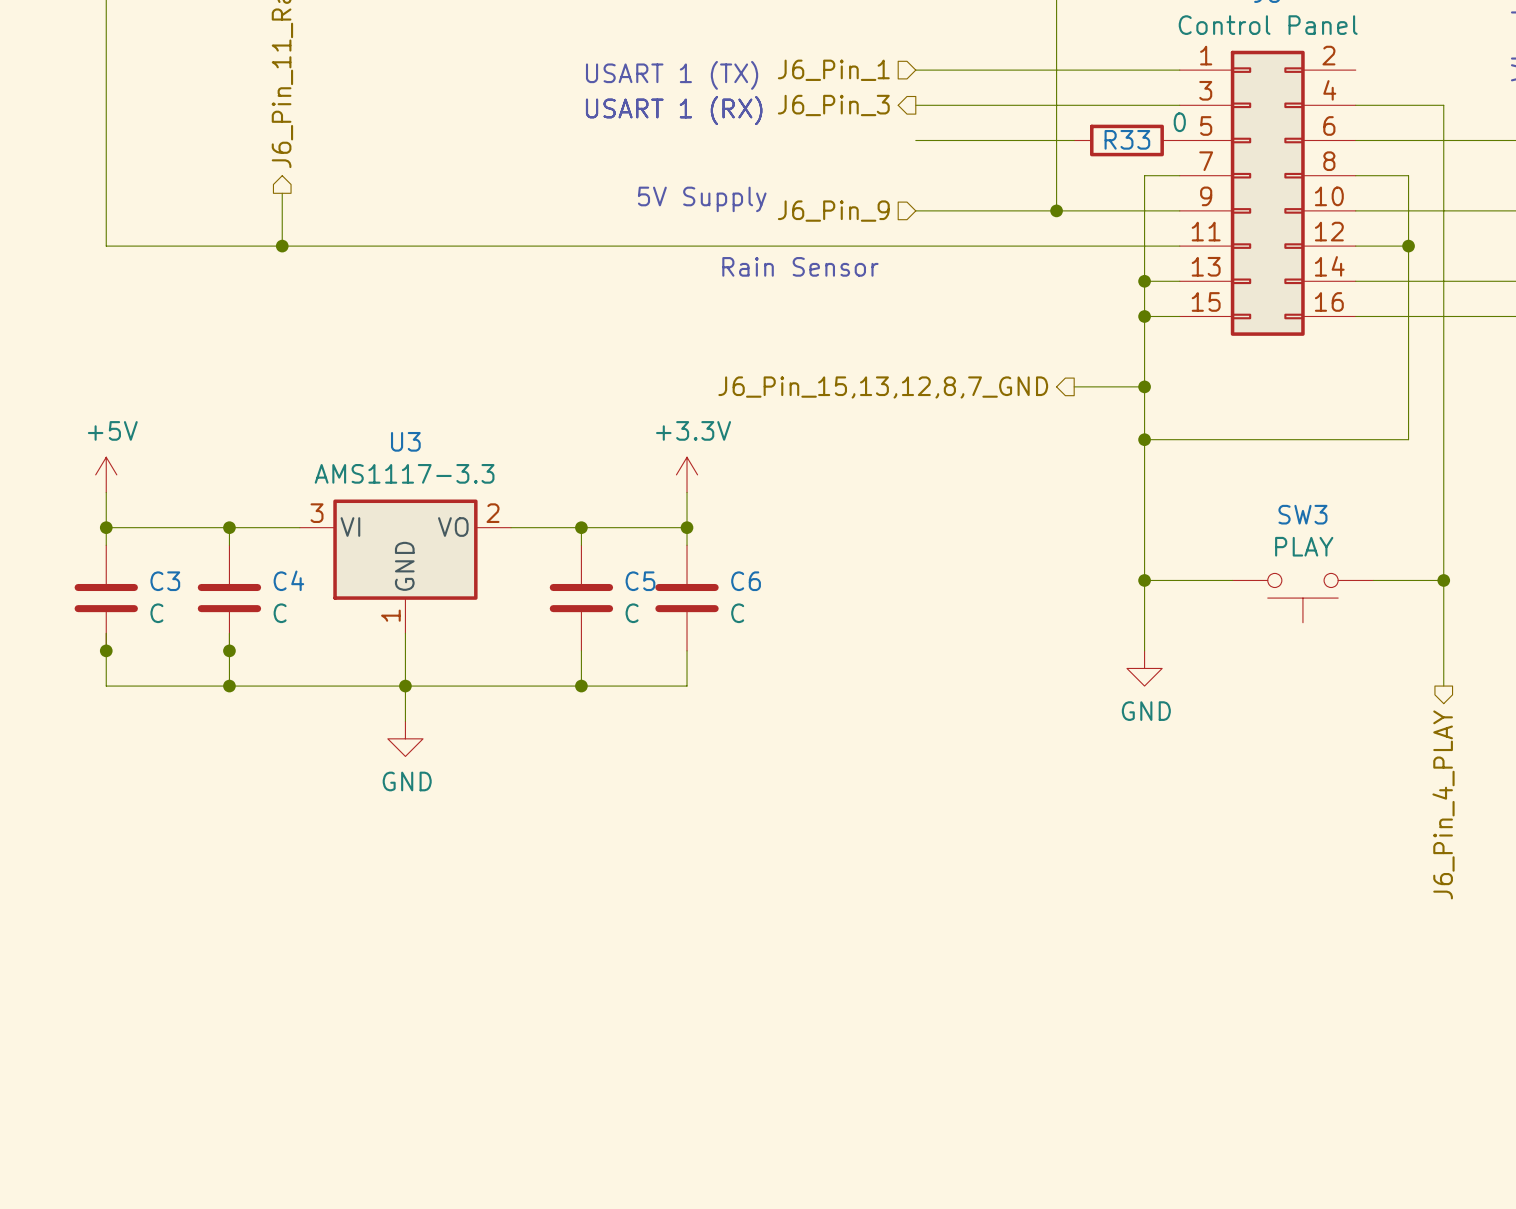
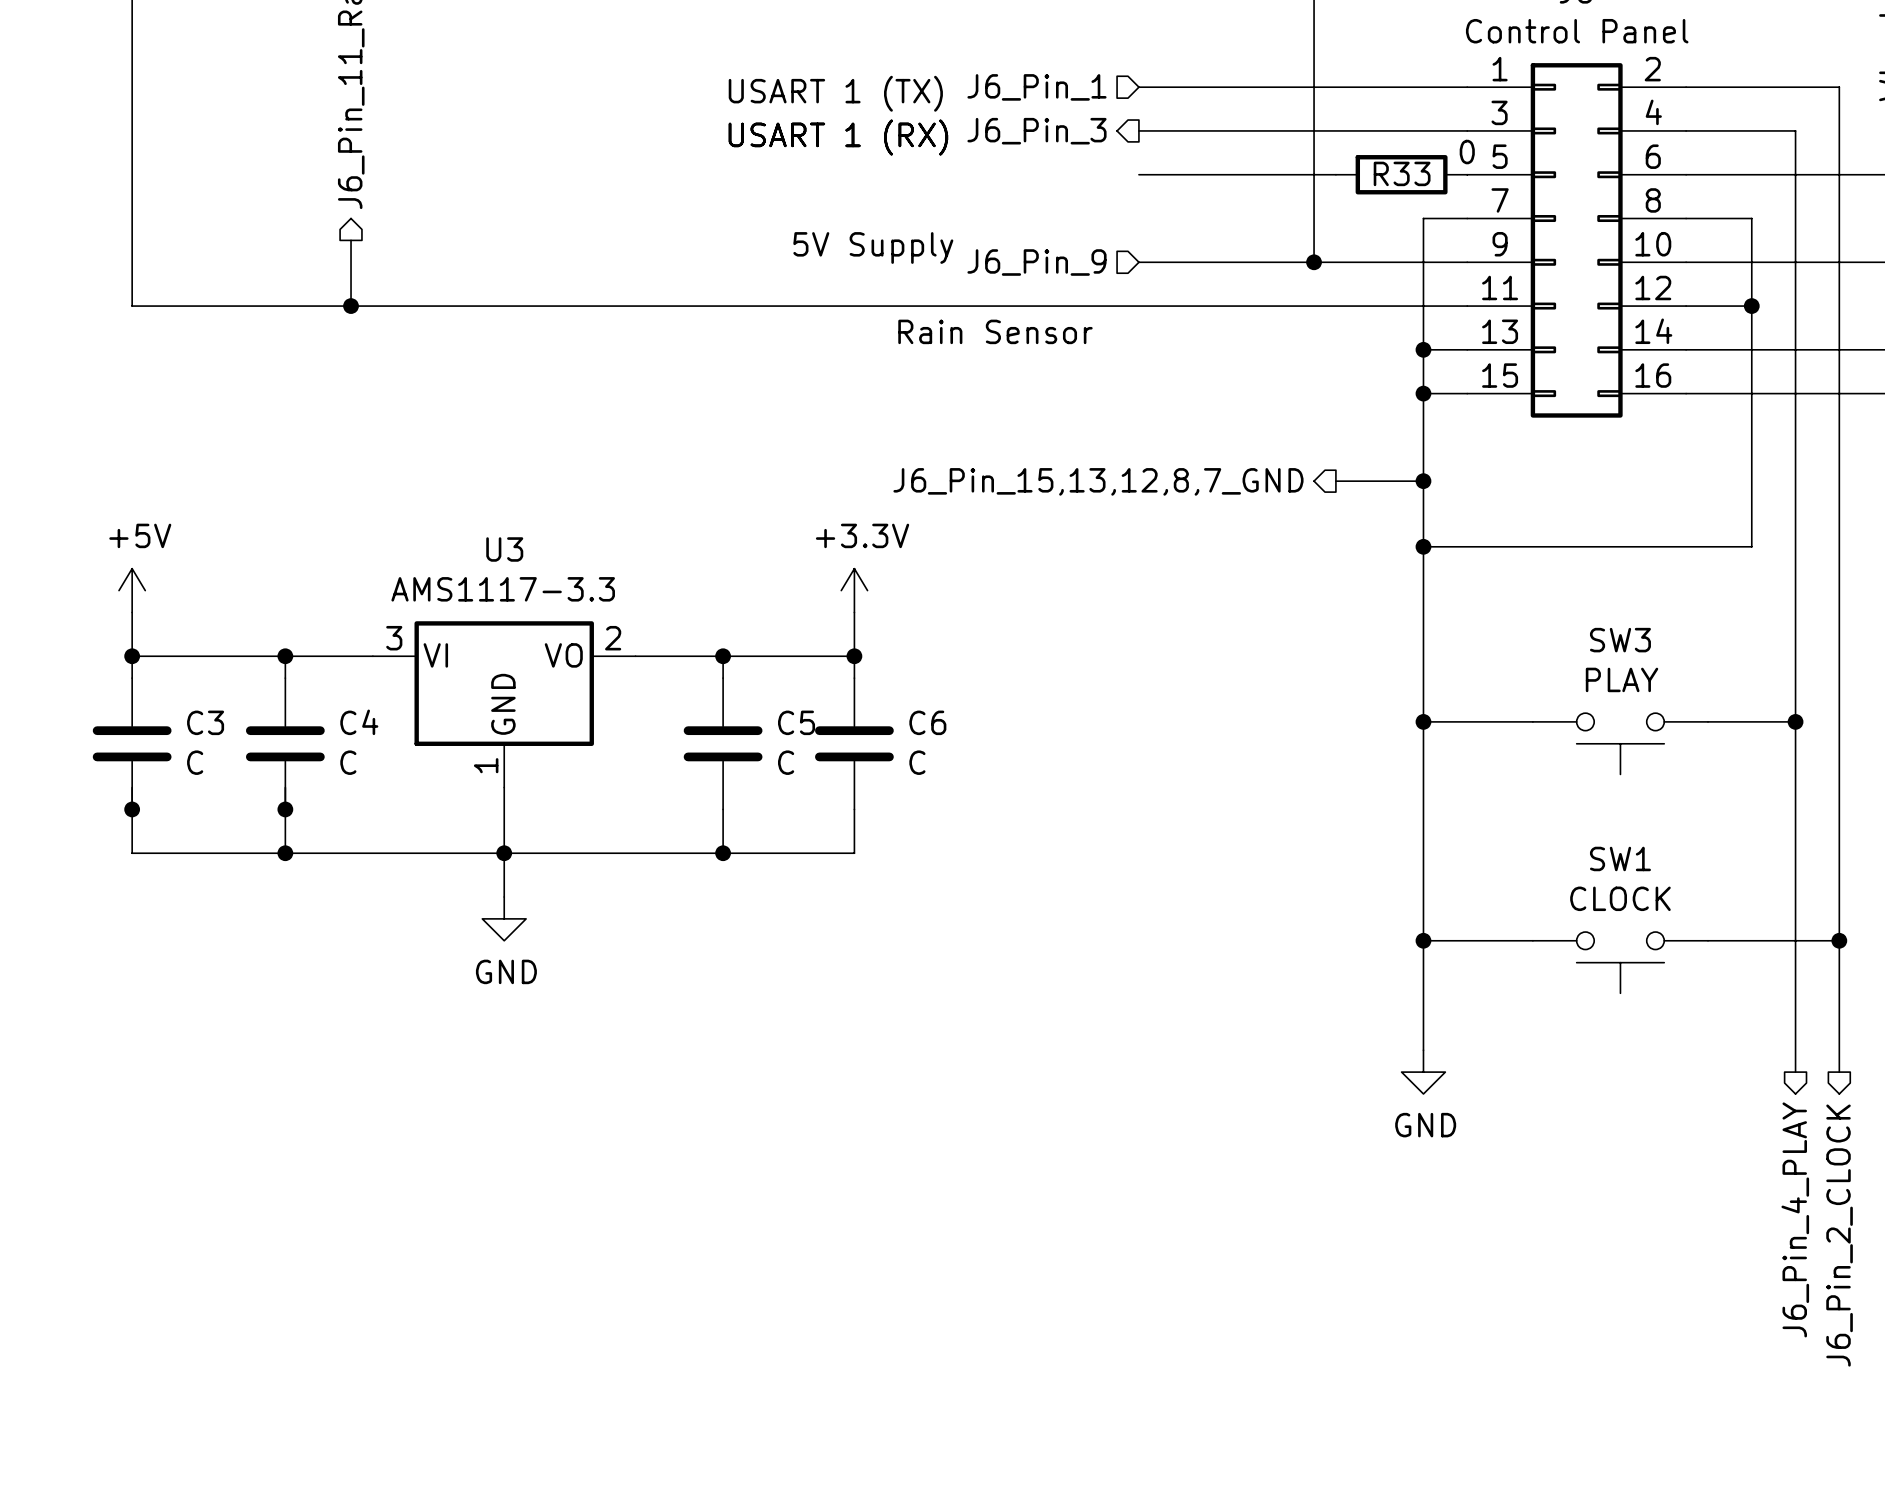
wire: none -> (1686, 87) (1839, 87) (1839, 1072)
wire: none -> (1423, 809) (1423, 1050)
power symbol position: GND (1144, 668) -> GND (1423, 1072)
wire: none -> (1795, 853) (1795, 1072)
wire: none -> (1423, 940) (1532, 940)
junction: none -> (1423, 940)
wire: none -> (1708, 940) (1839, 940)
junction: none -> (1839, 940)
SW1: none -> CLOCK (1620, 962)
hierarchical label position: J6_Pin_4_PLAY (1443, 804) -> J6_Pin_4_PLAY (1795, 1219)
hierarchical label: none -> J6_Pin_2_CLOCK (1839, 1235)

